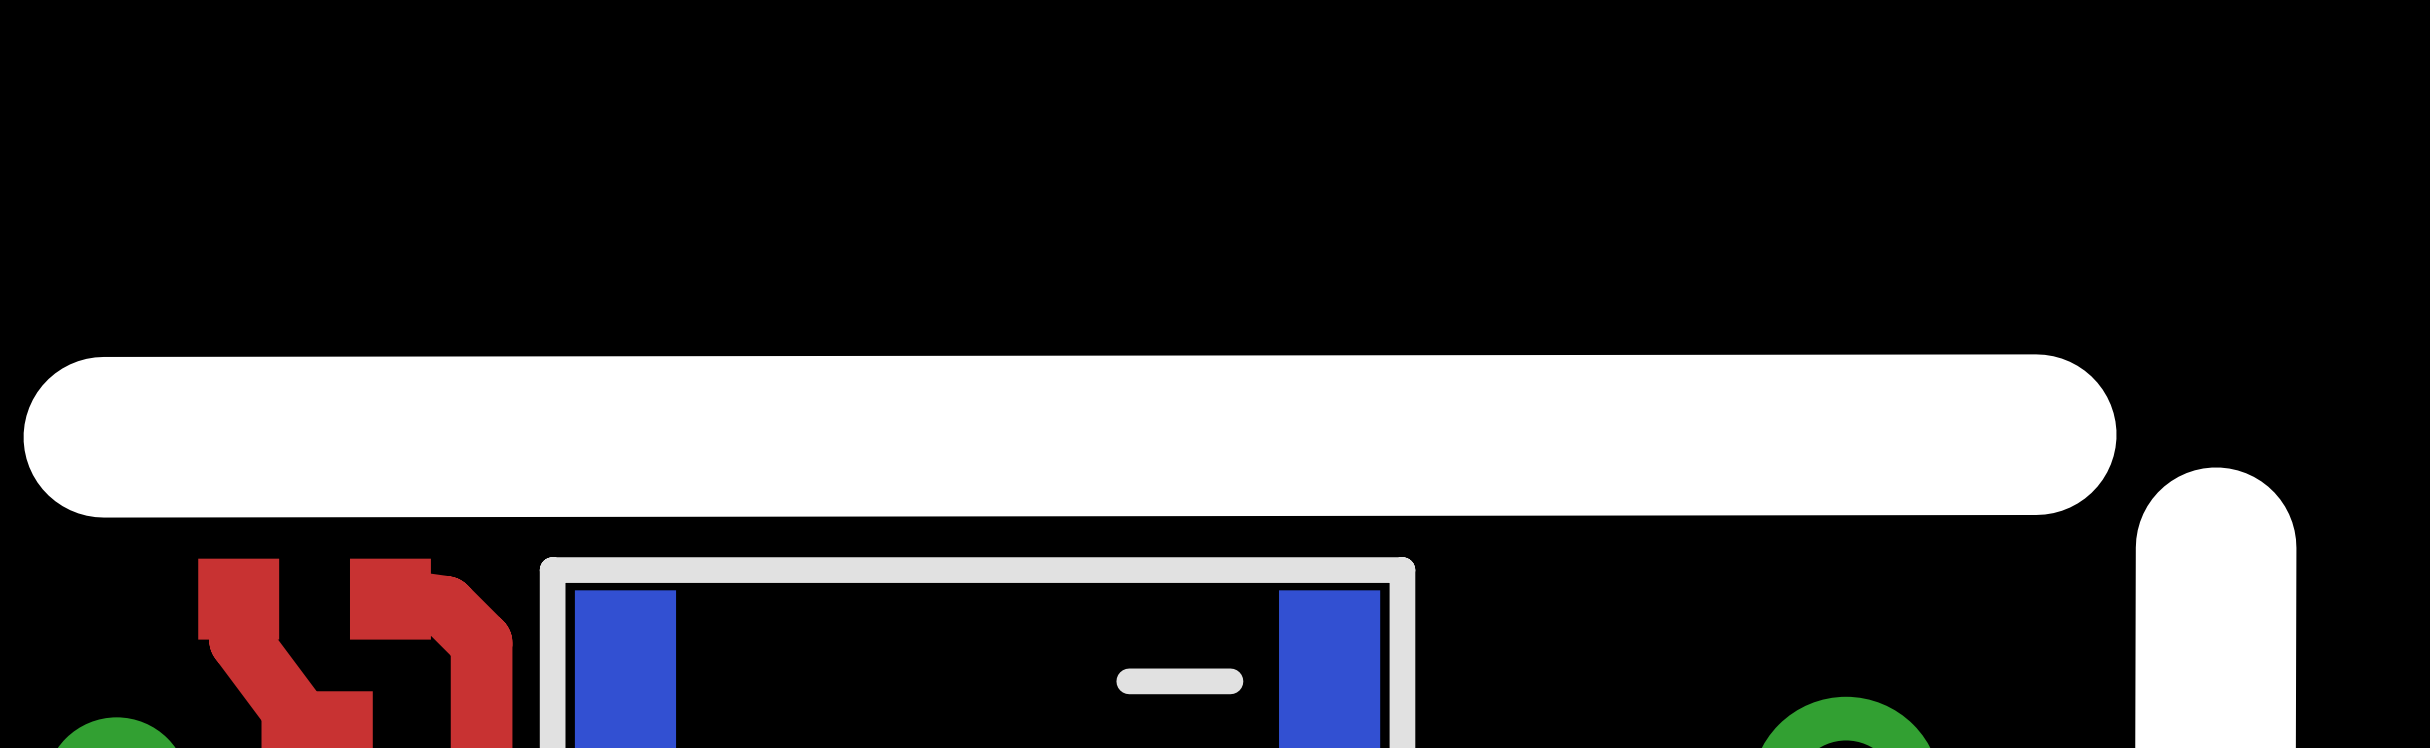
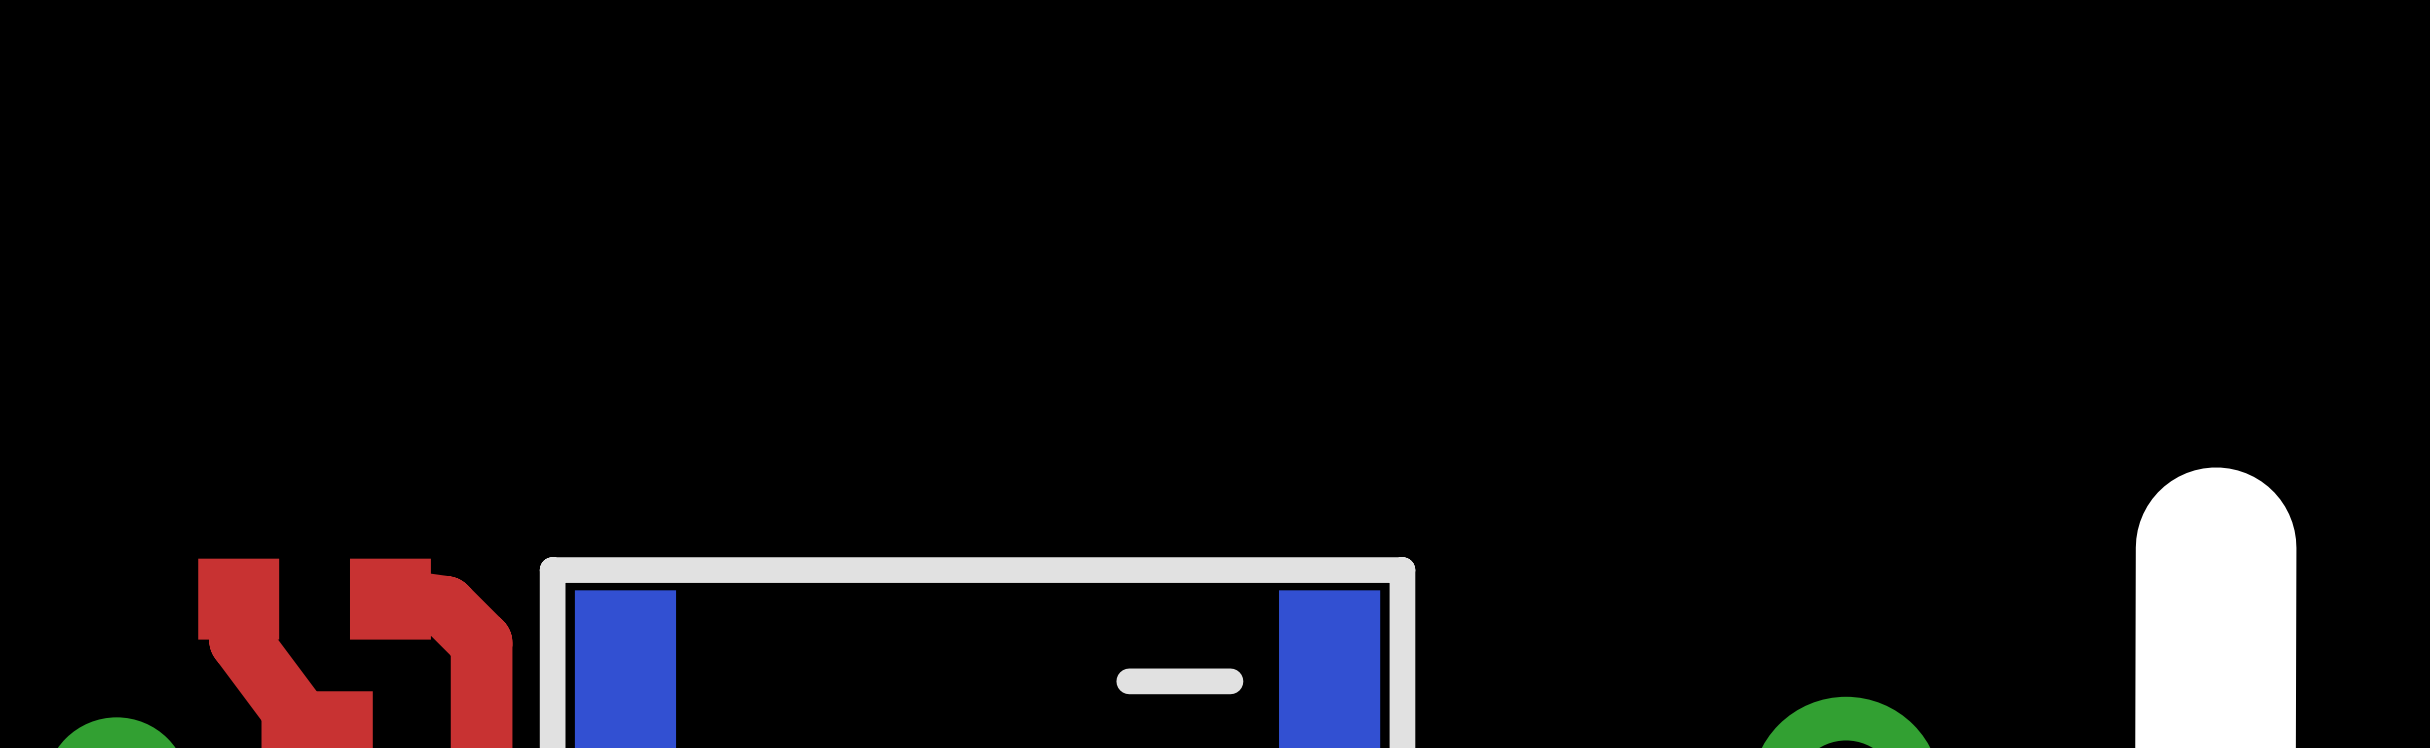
board edge: (2036, 434) (103, 437) -> none

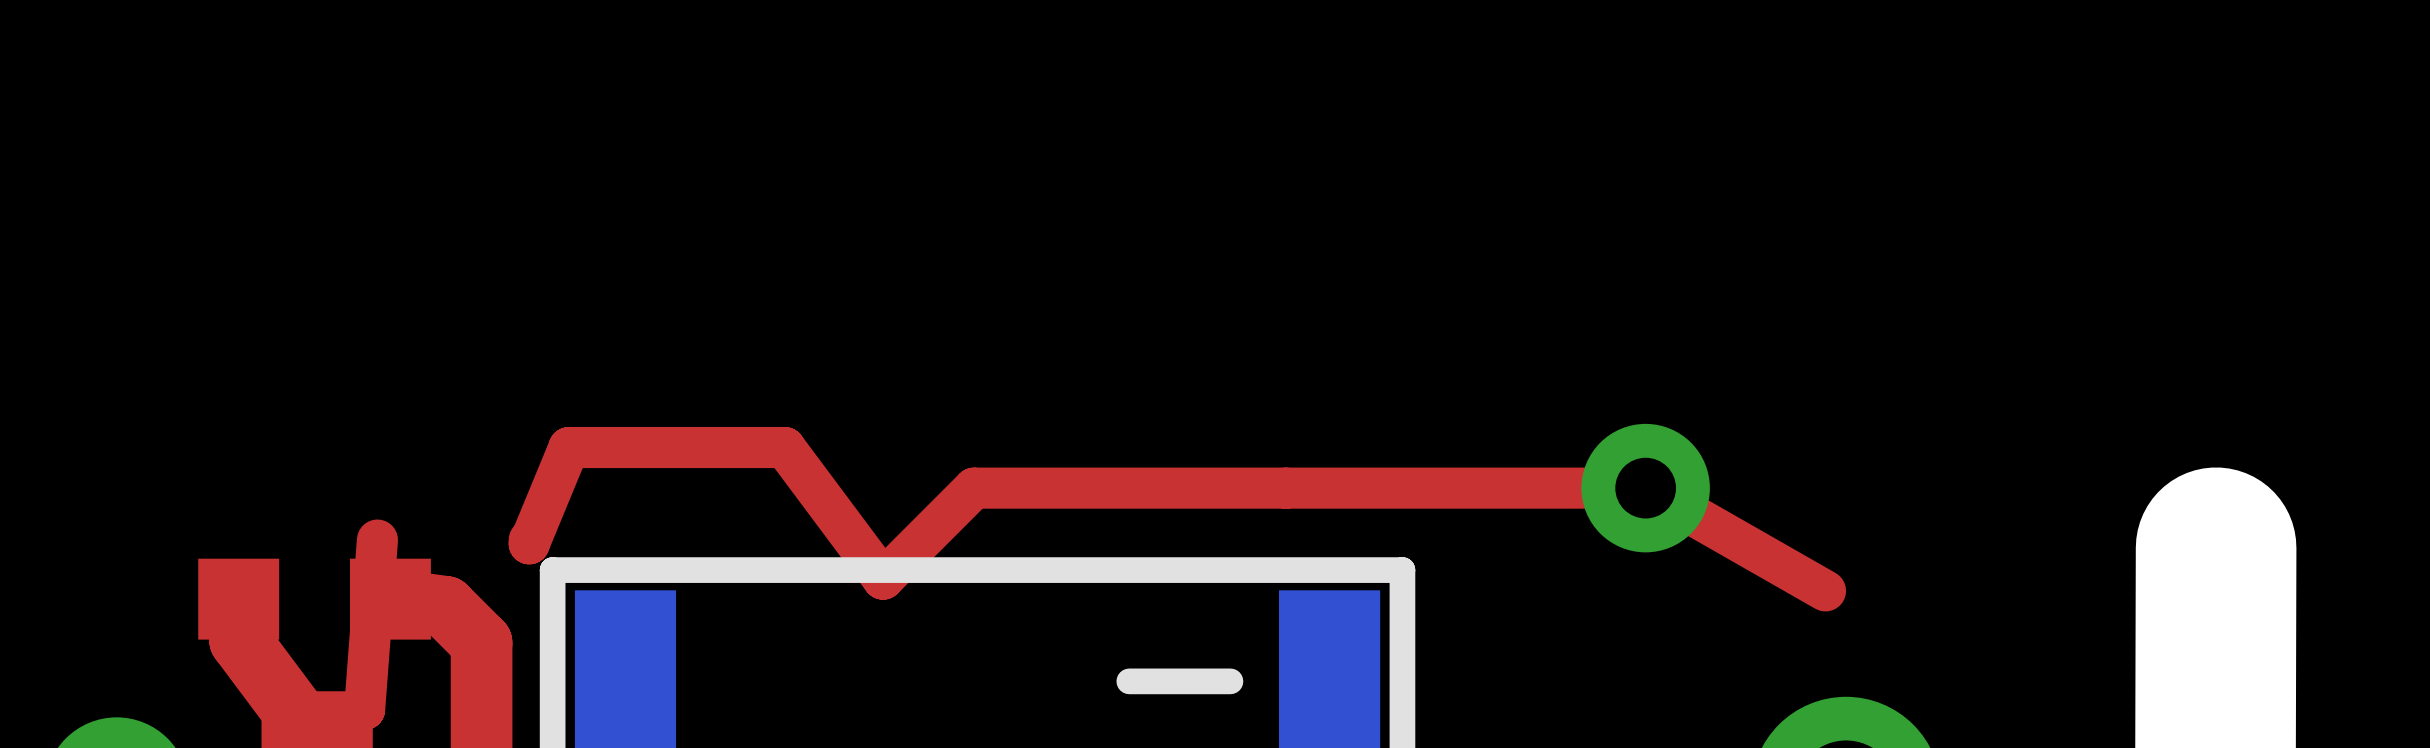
top track: none -> (1645, 488) (974, 488) (883, 579) (784, 447) (568, 447) (529, 543) (529, 540)
top track: none -> (1645, 488) (1825, 590)
via: none -> (1645, 488)
top track: none -> (377, 540) (364, 709) (362, 707)

